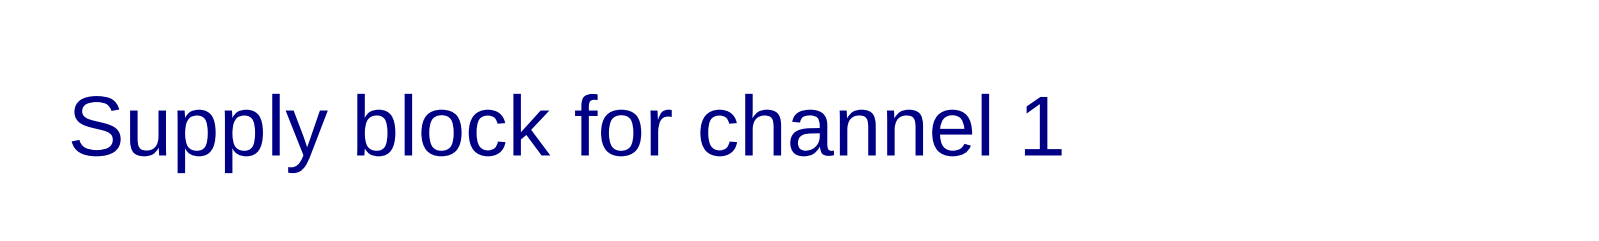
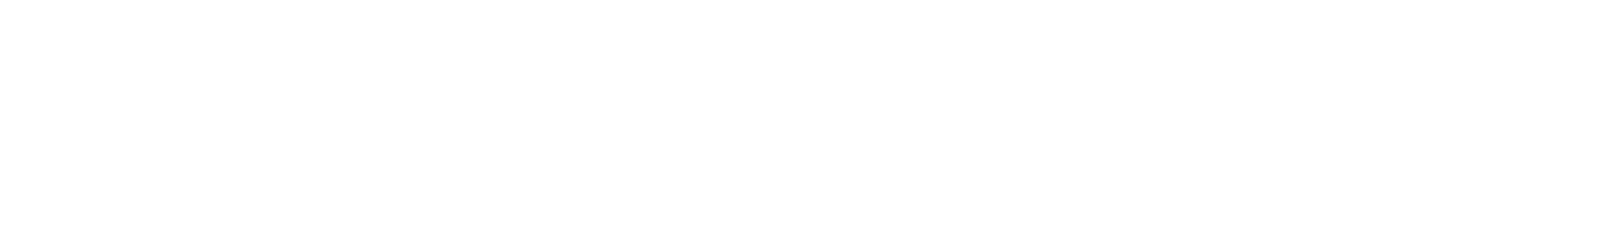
text: Supply block for channel 1 (566, 133) -> none

